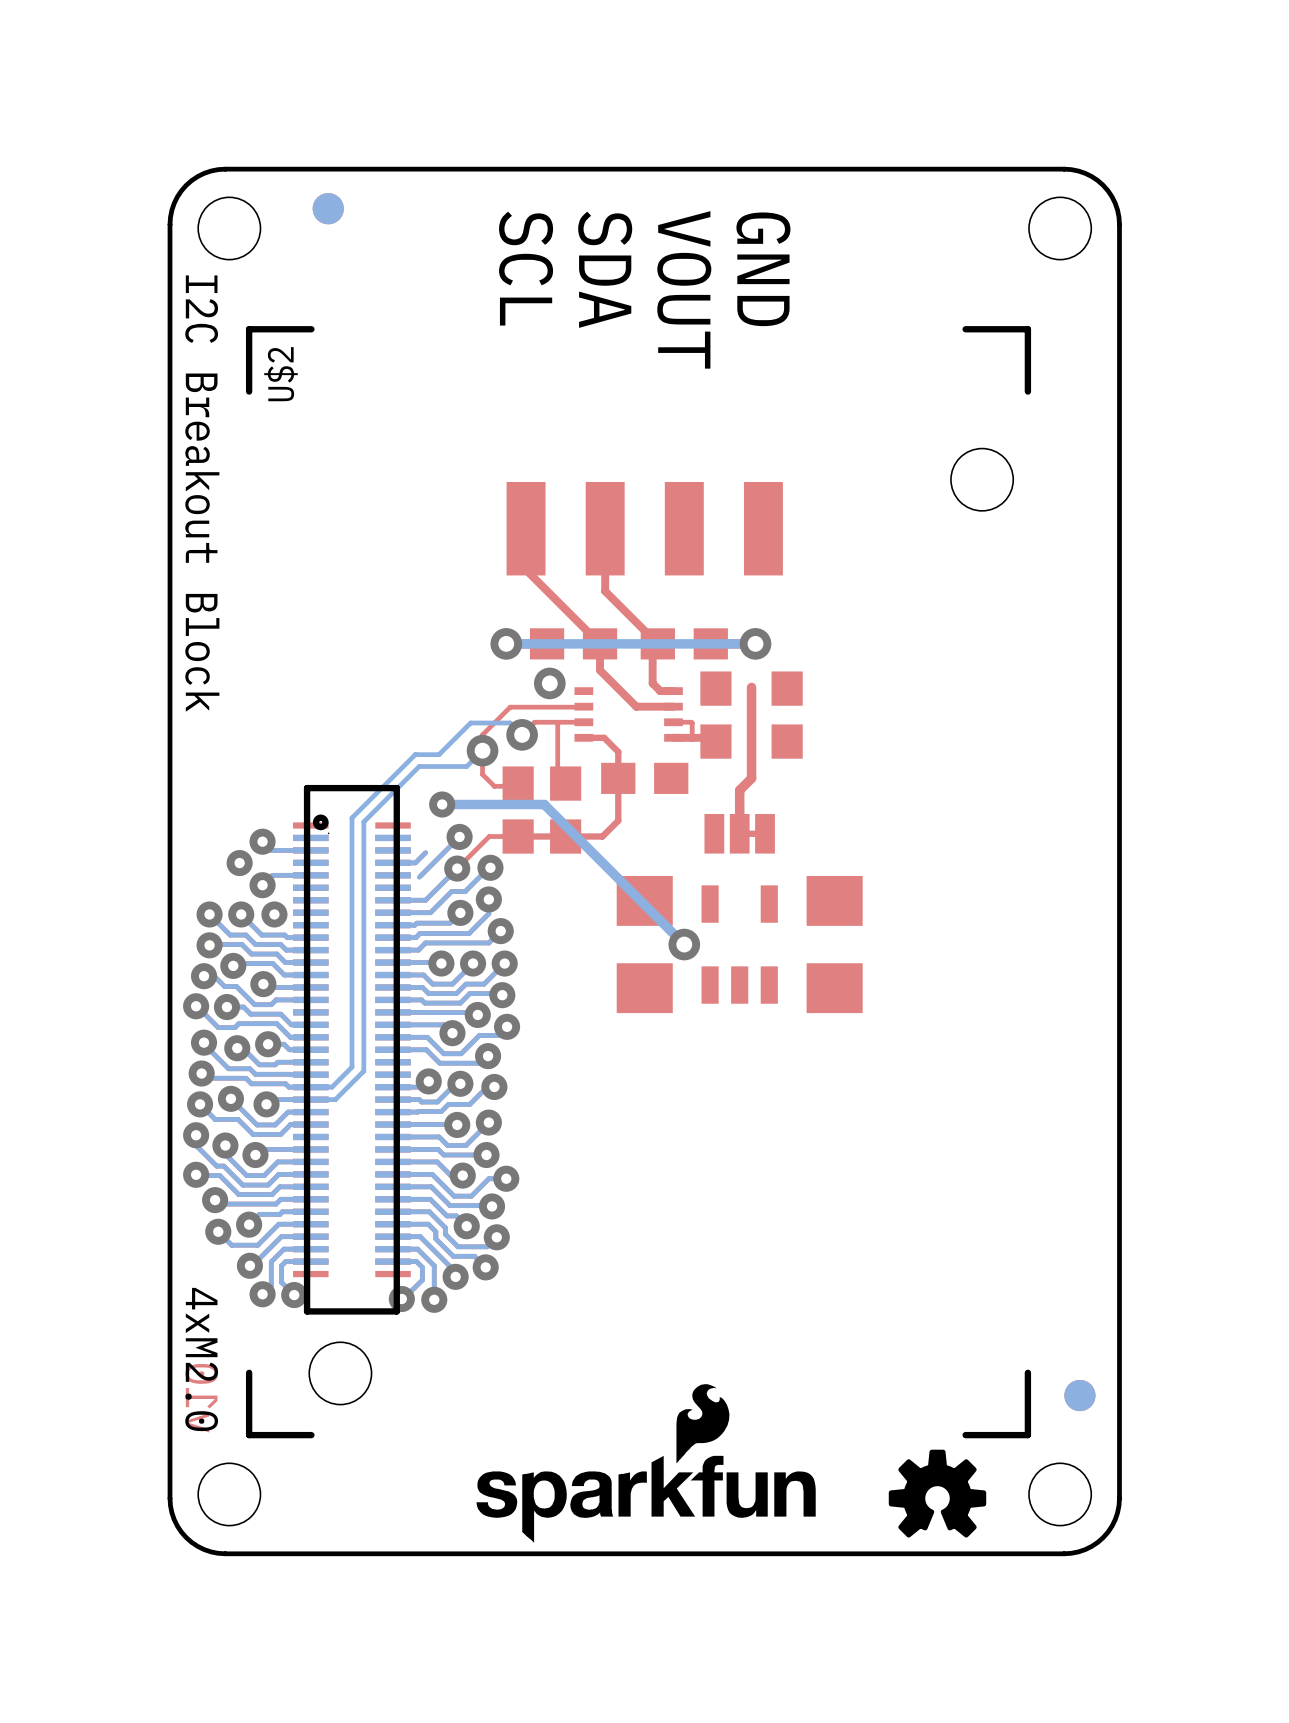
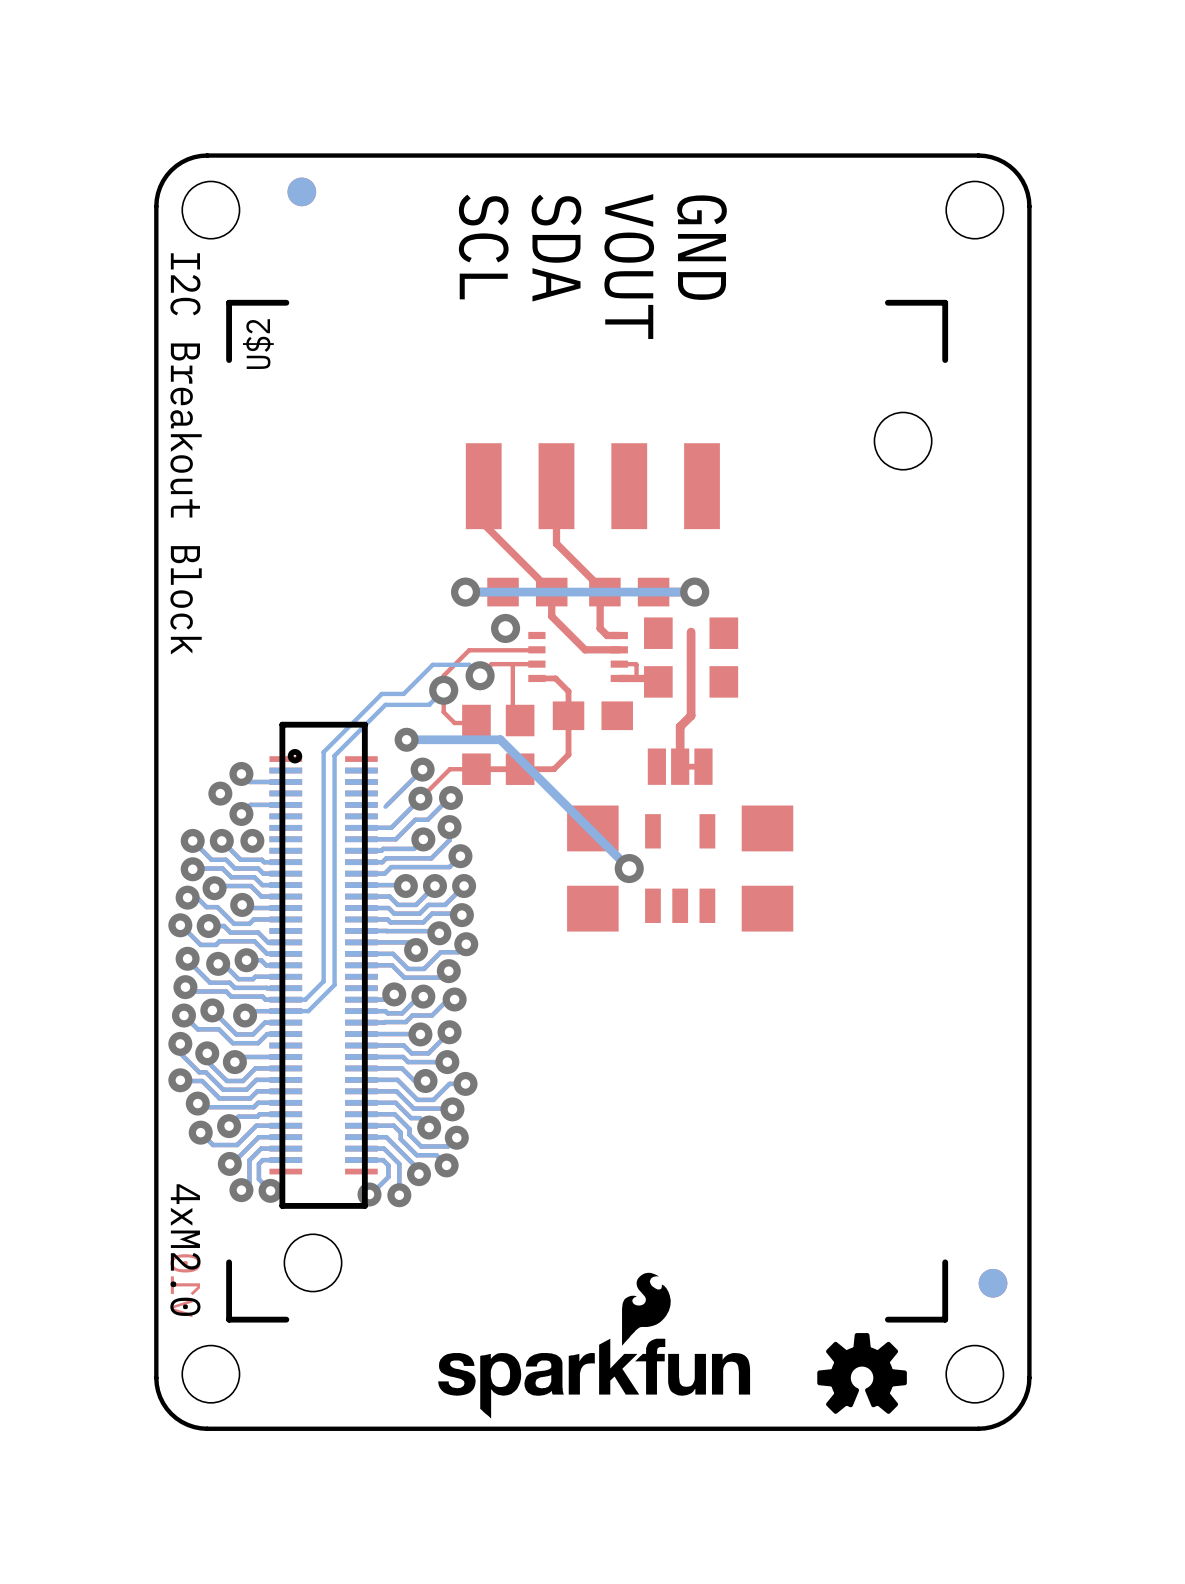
U$2 footprint: [245, 326, 1032, 1439] -> [226, 299, 949, 1323]
bottom track: (425, 852) (415, 862) (393, 862) -> none

